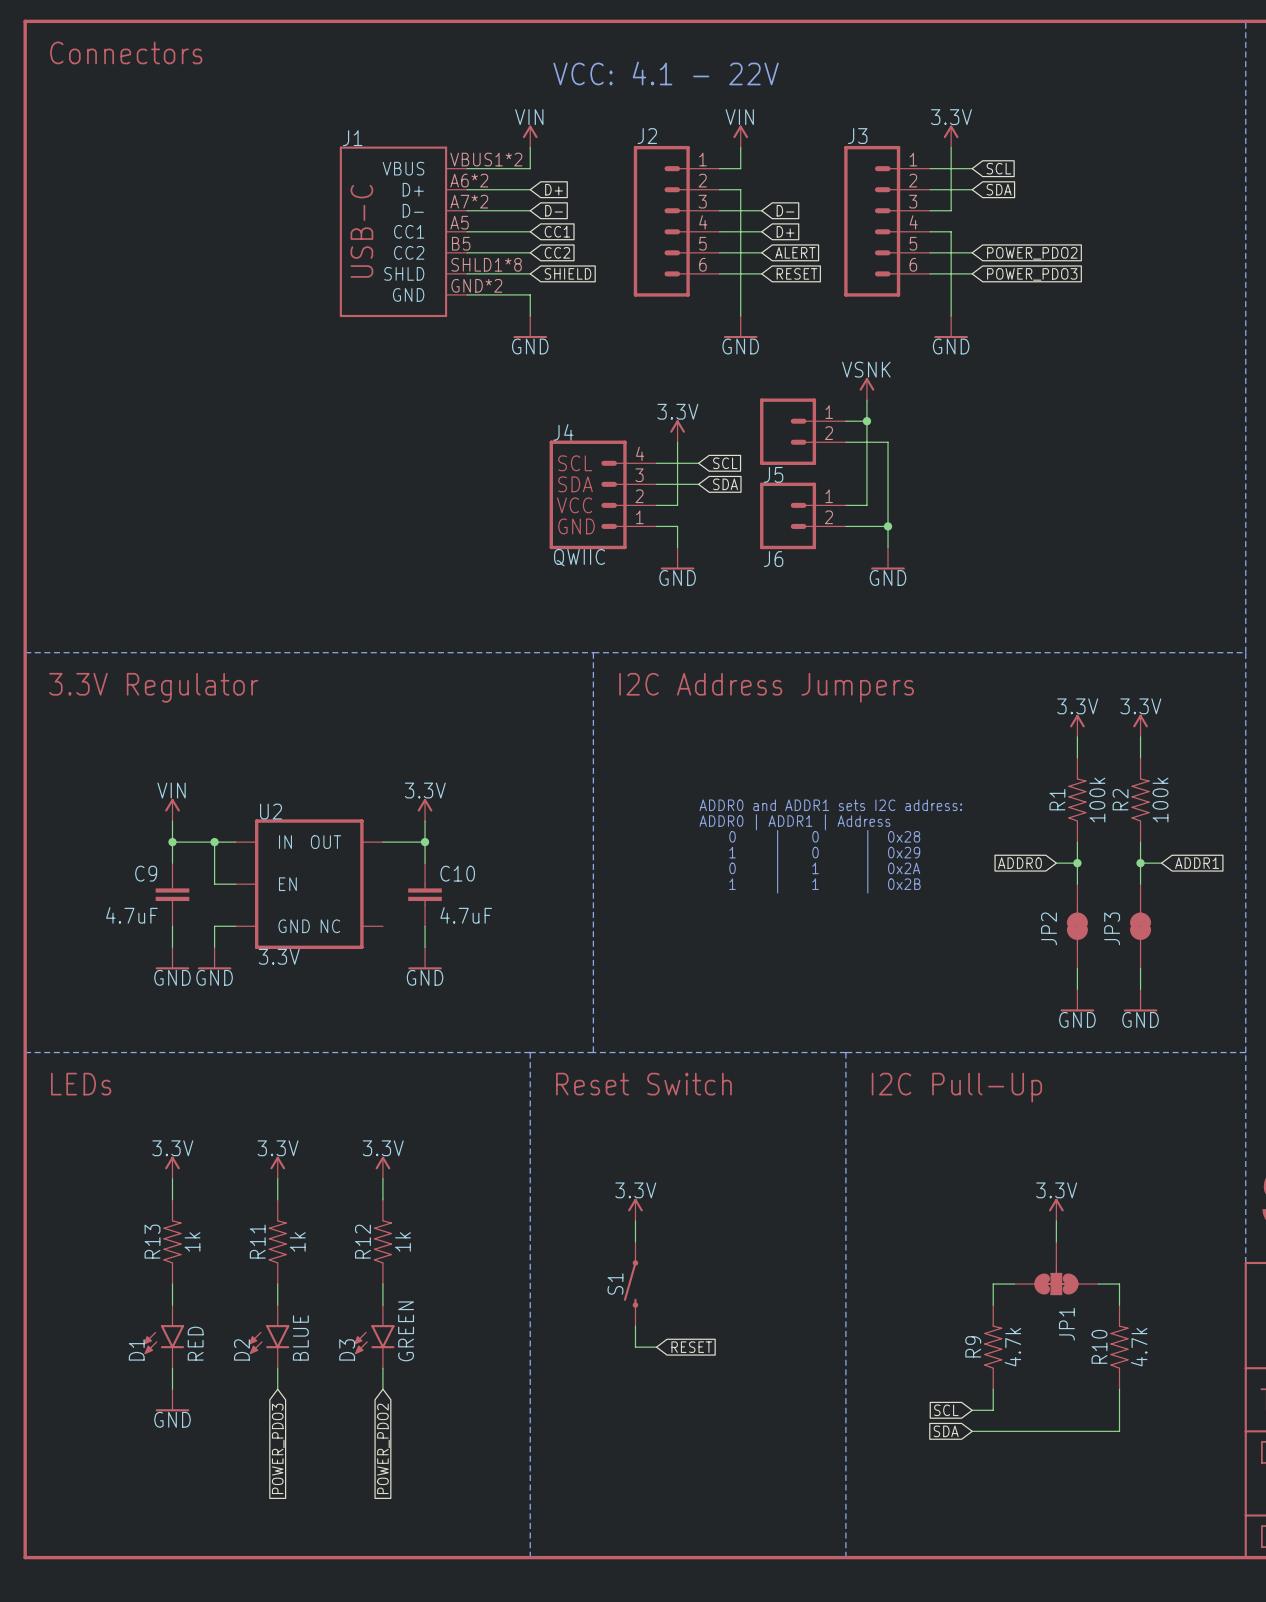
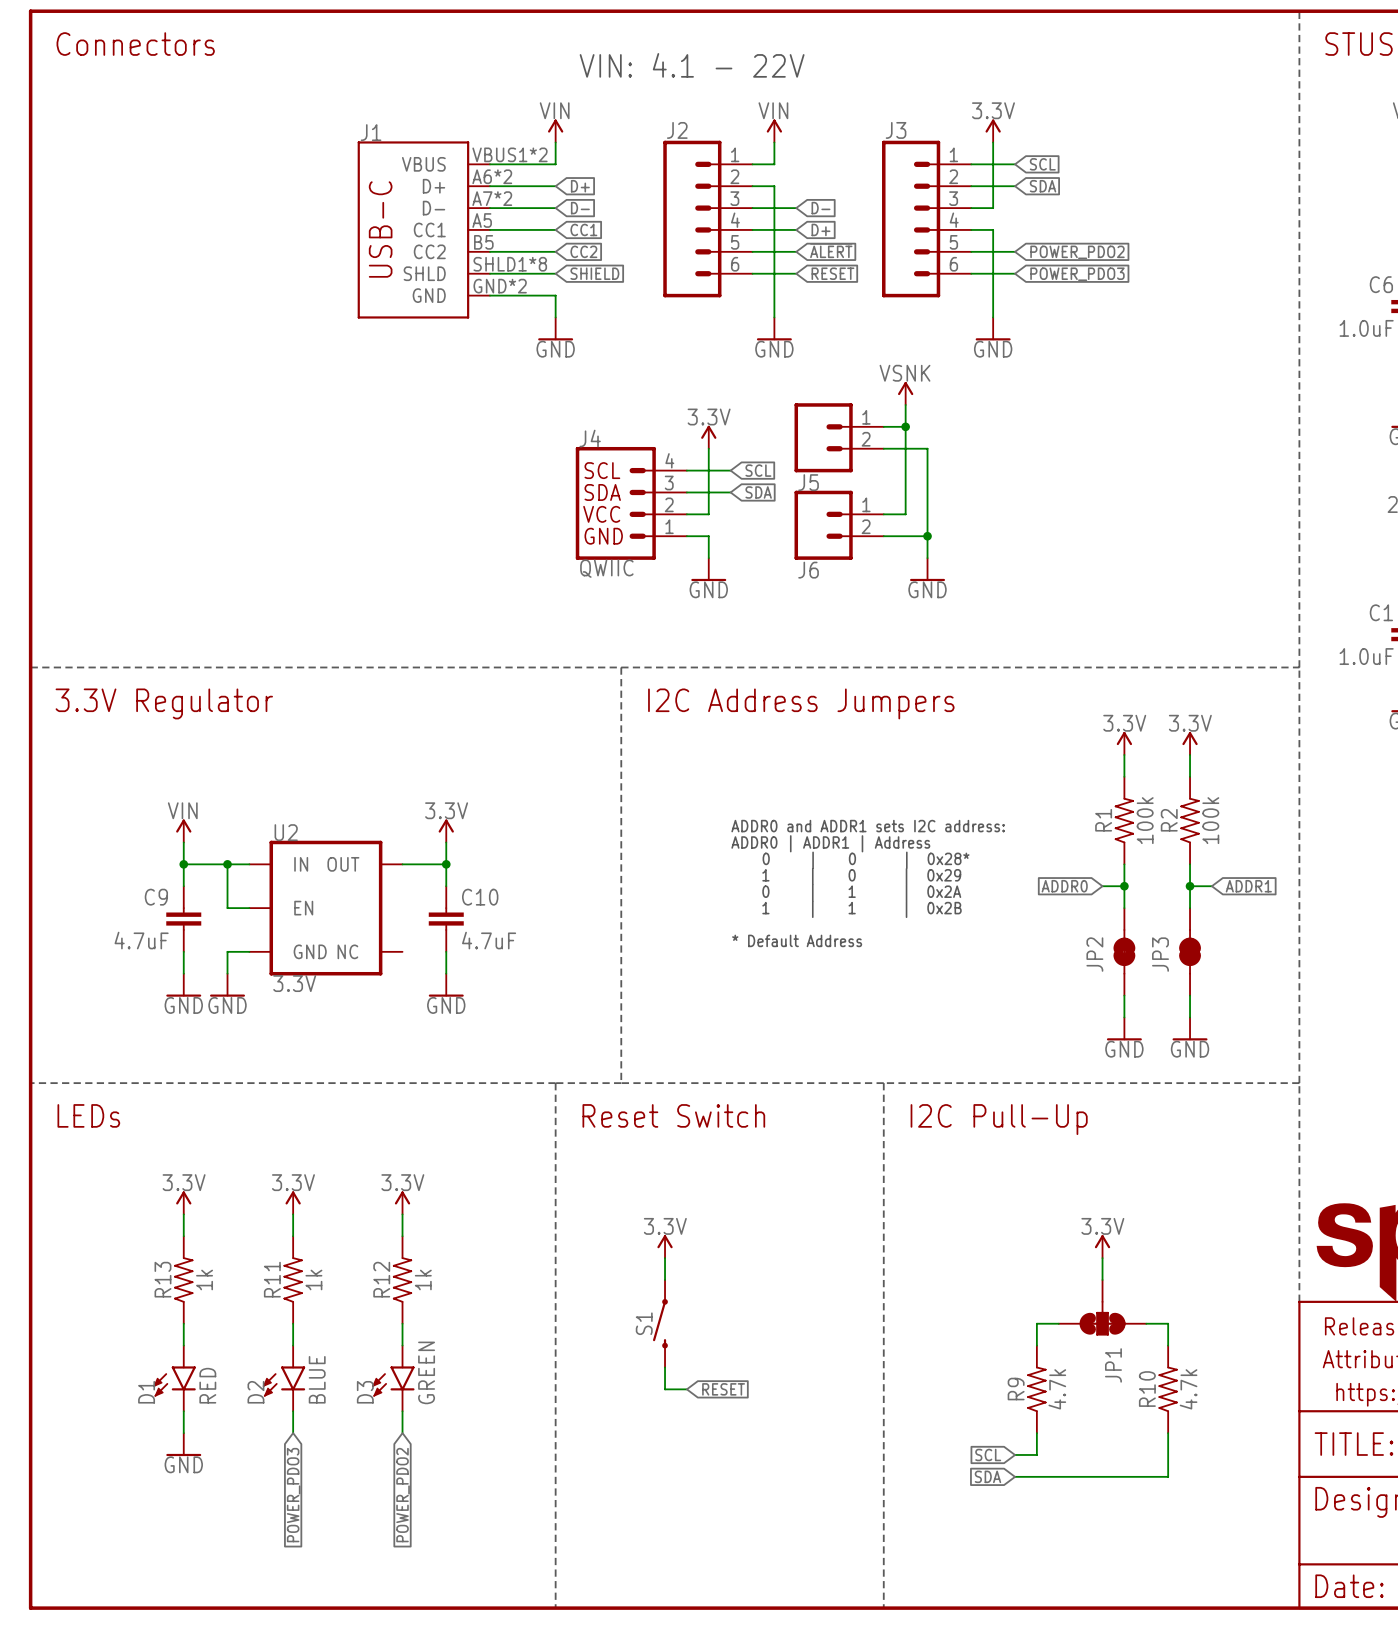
text: VCC: 4.1 - 22V (666, 73) -> VIN: 4.1 - 22V (692, 65)
global label: ALERT (795, 252) -> ~{ALERT} (831, 250)
text: 0 | 0 | 0x28 (824, 838) -> 0 | 0 | 0x28* (866, 860)
text: none -> * Default Address (797, 940)

